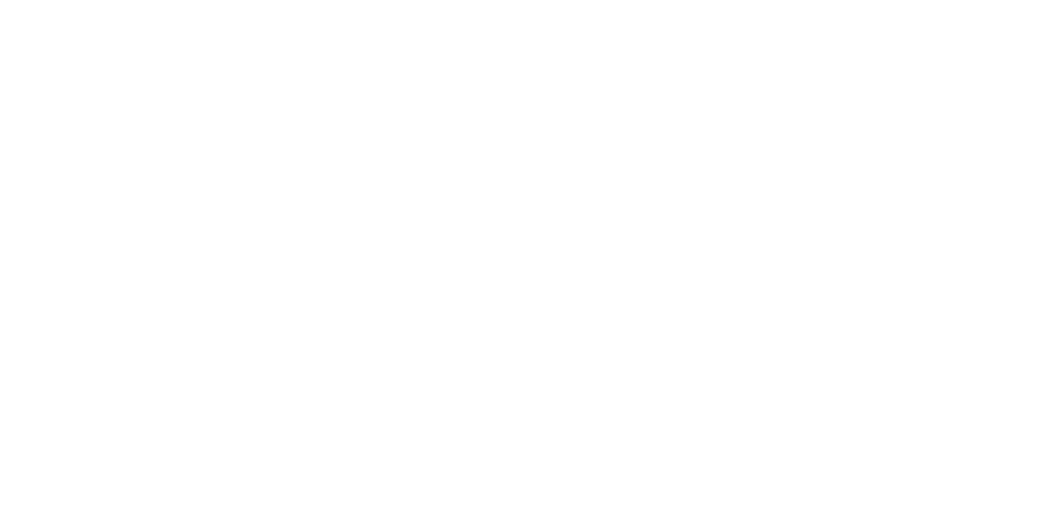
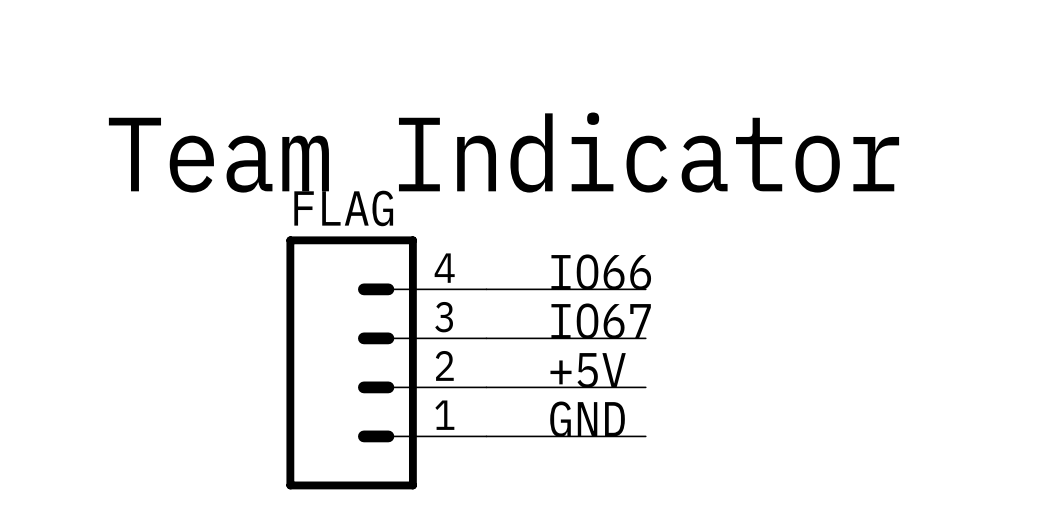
text: none -> Team Indicator (504, 152)
label: none -> IO66 (601, 272)
wire: none -> (486, 289) (645, 289)
label: none -> IO67 (601, 321)
wire: none -> (486, 338) (645, 338)
FLAG: none -> (386, 362)
label: none -> +5V (588, 370)
wire: none -> (486, 387) (645, 387)
label: none -> GND (587, 419)
wire: none -> (486, 436) (645, 436)

